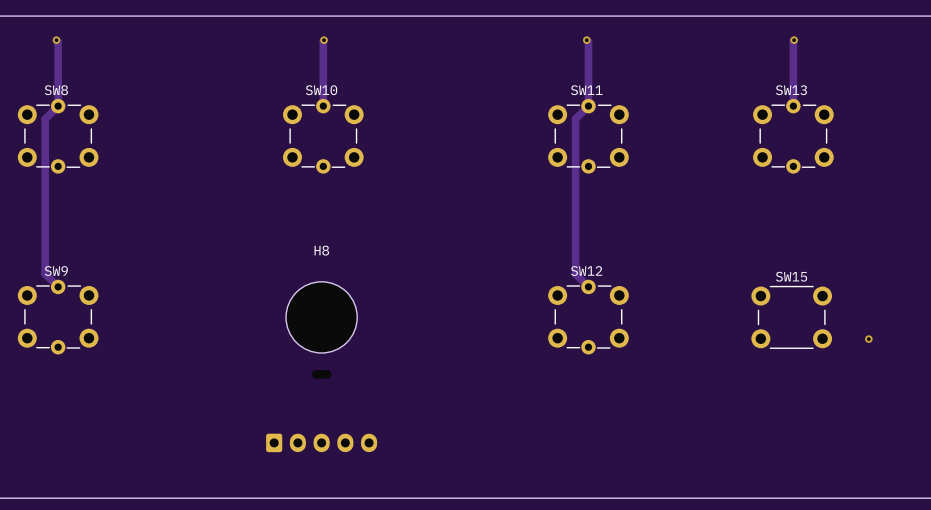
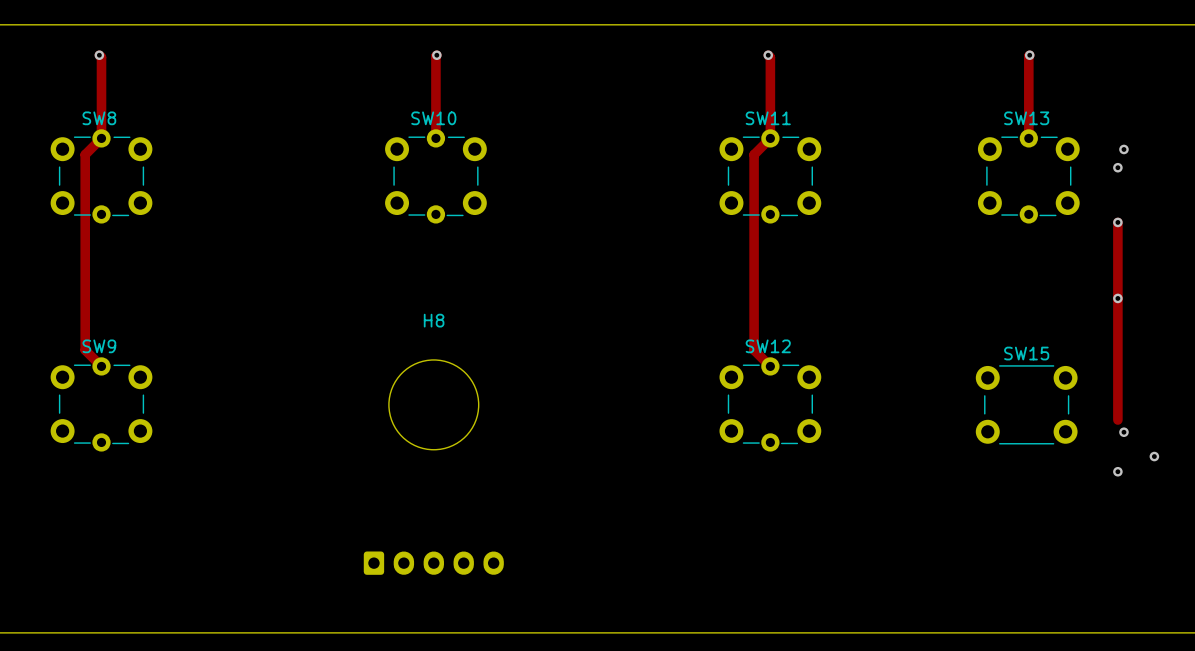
via: none -> (1123, 149)
via: none -> (1117, 167)
track: none -> (1117, 222) (1117, 420)
via: none -> (1117, 222)
via: none -> (1117, 298)
via: none -> (1154, 456)
via: none -> (1117, 471)

